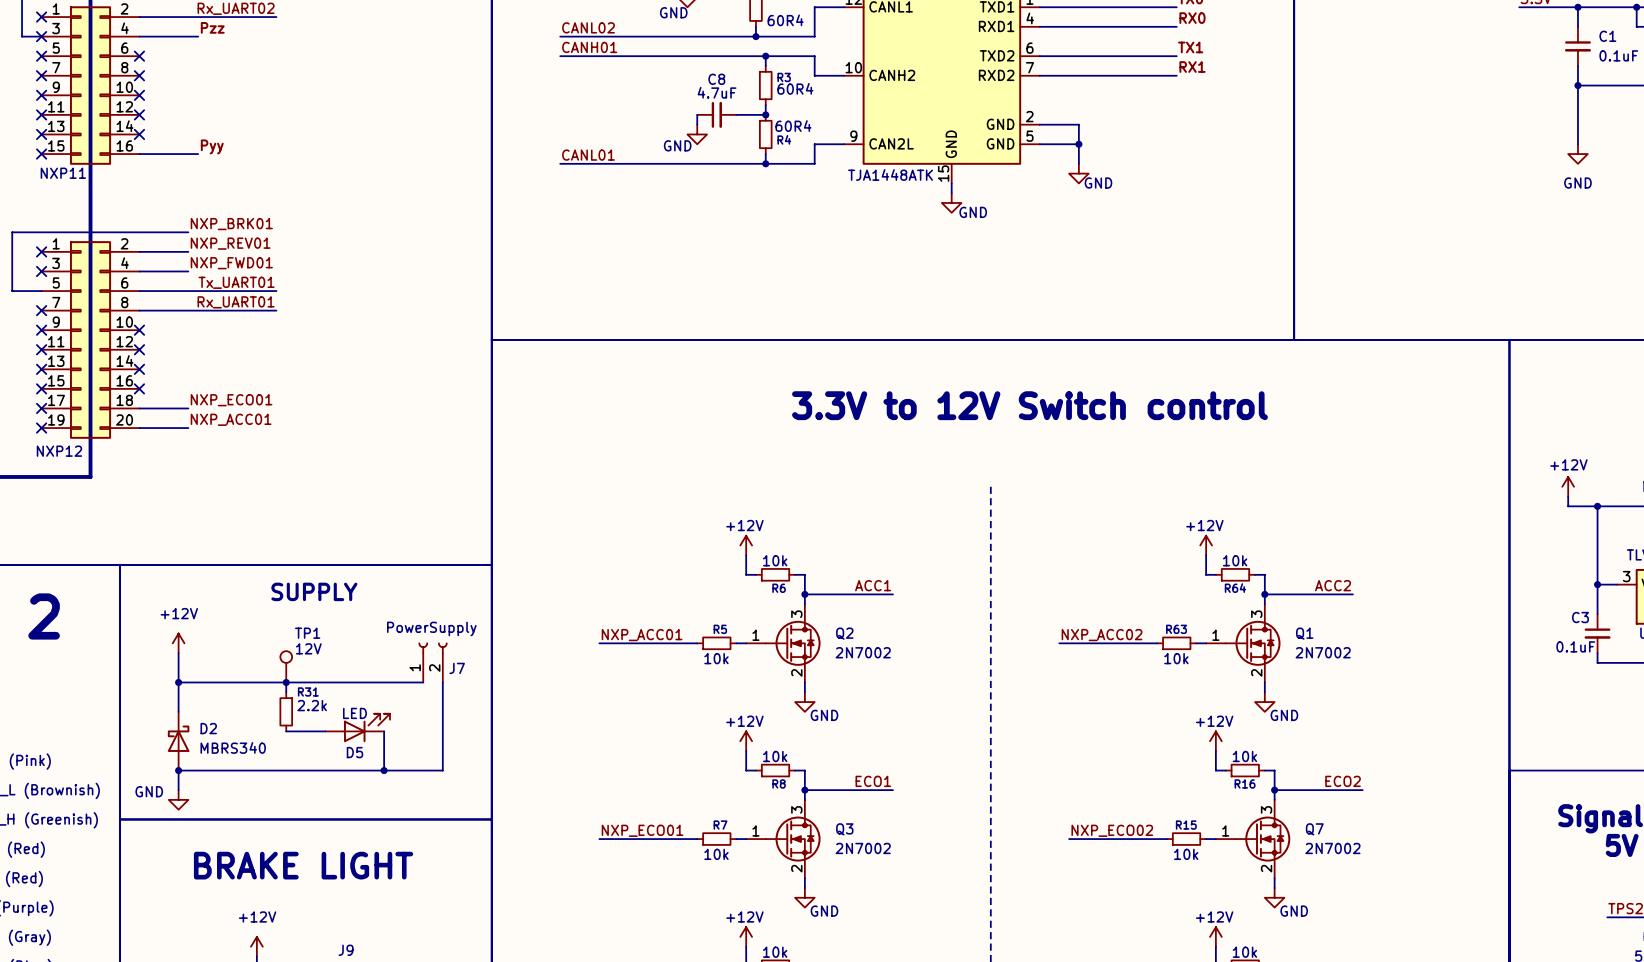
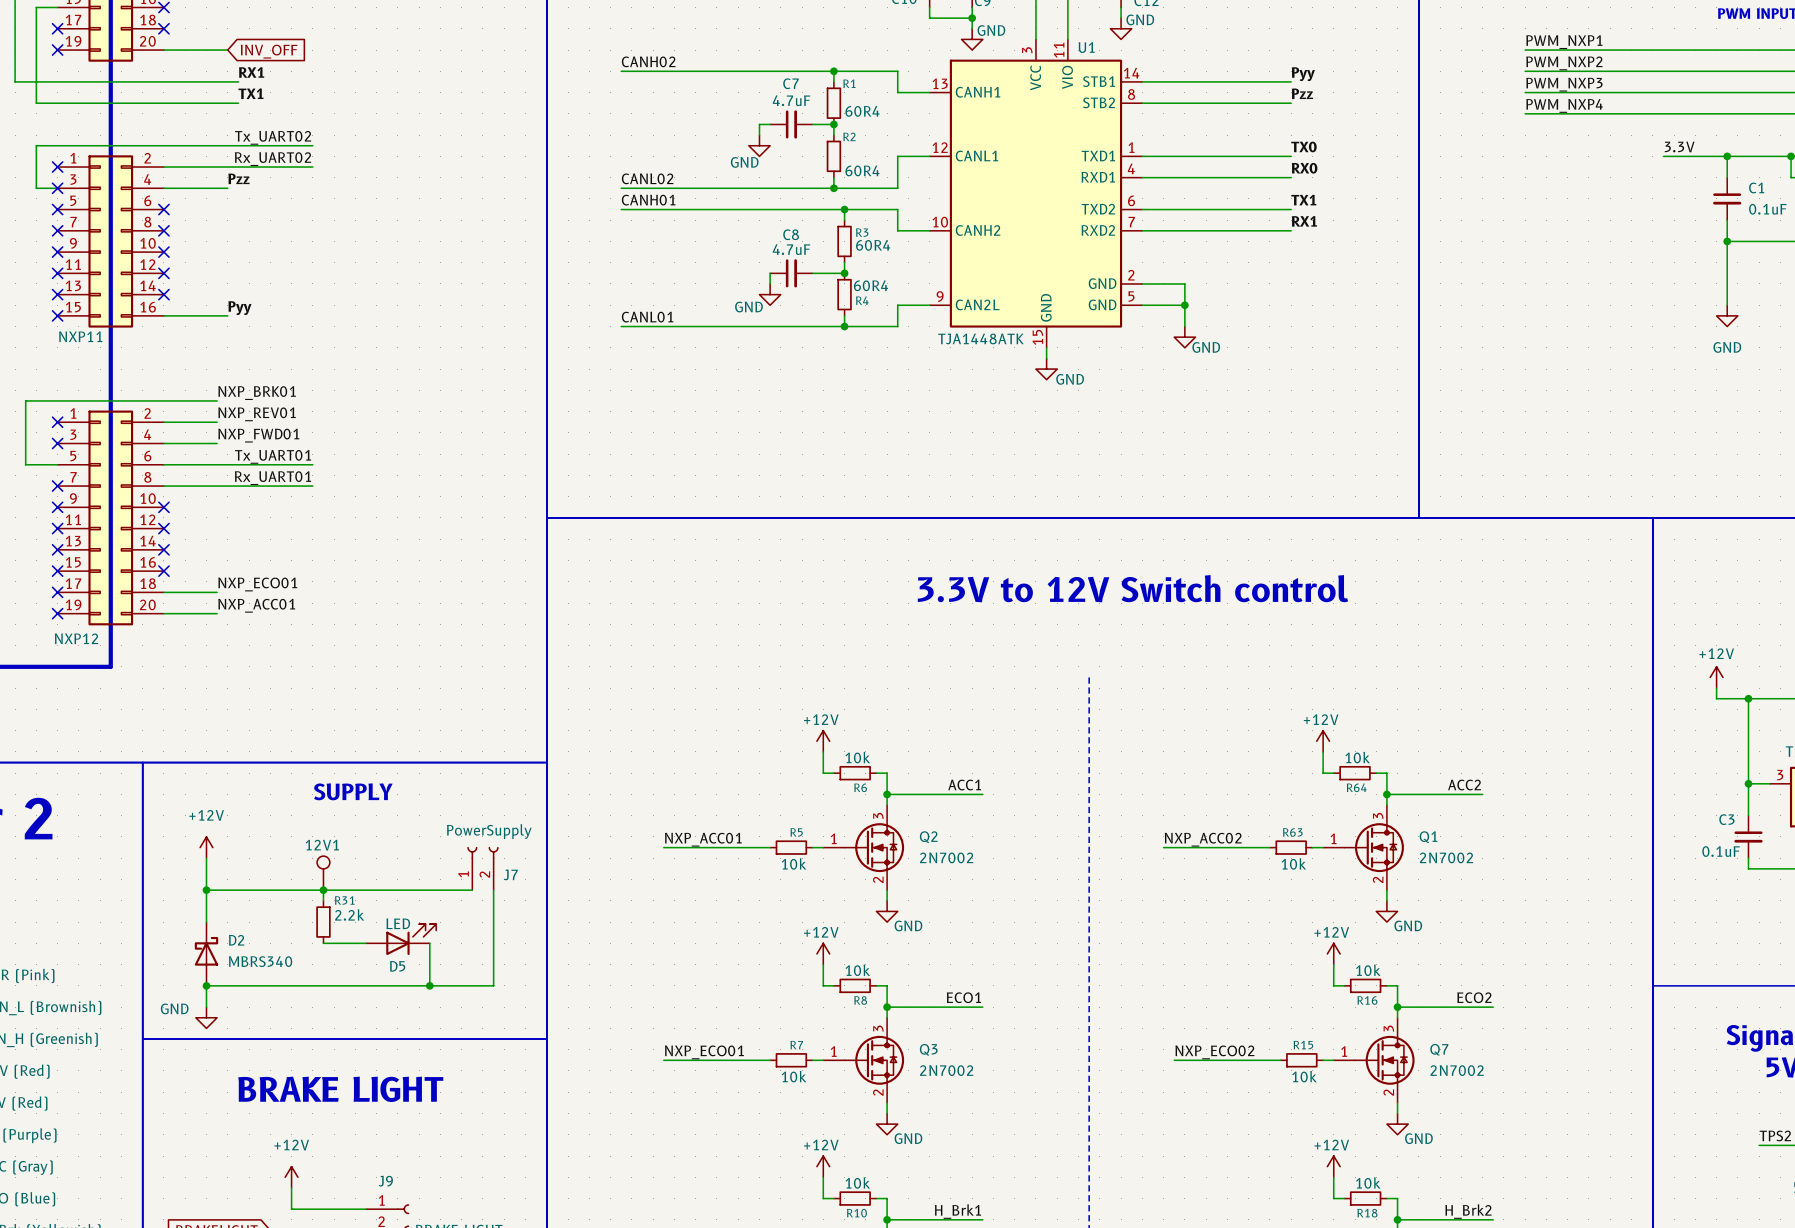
TP1 name: TP1 (307, 633) -> 12V1 (322, 845)
TP1 value: 12V (308, 648) -> none

